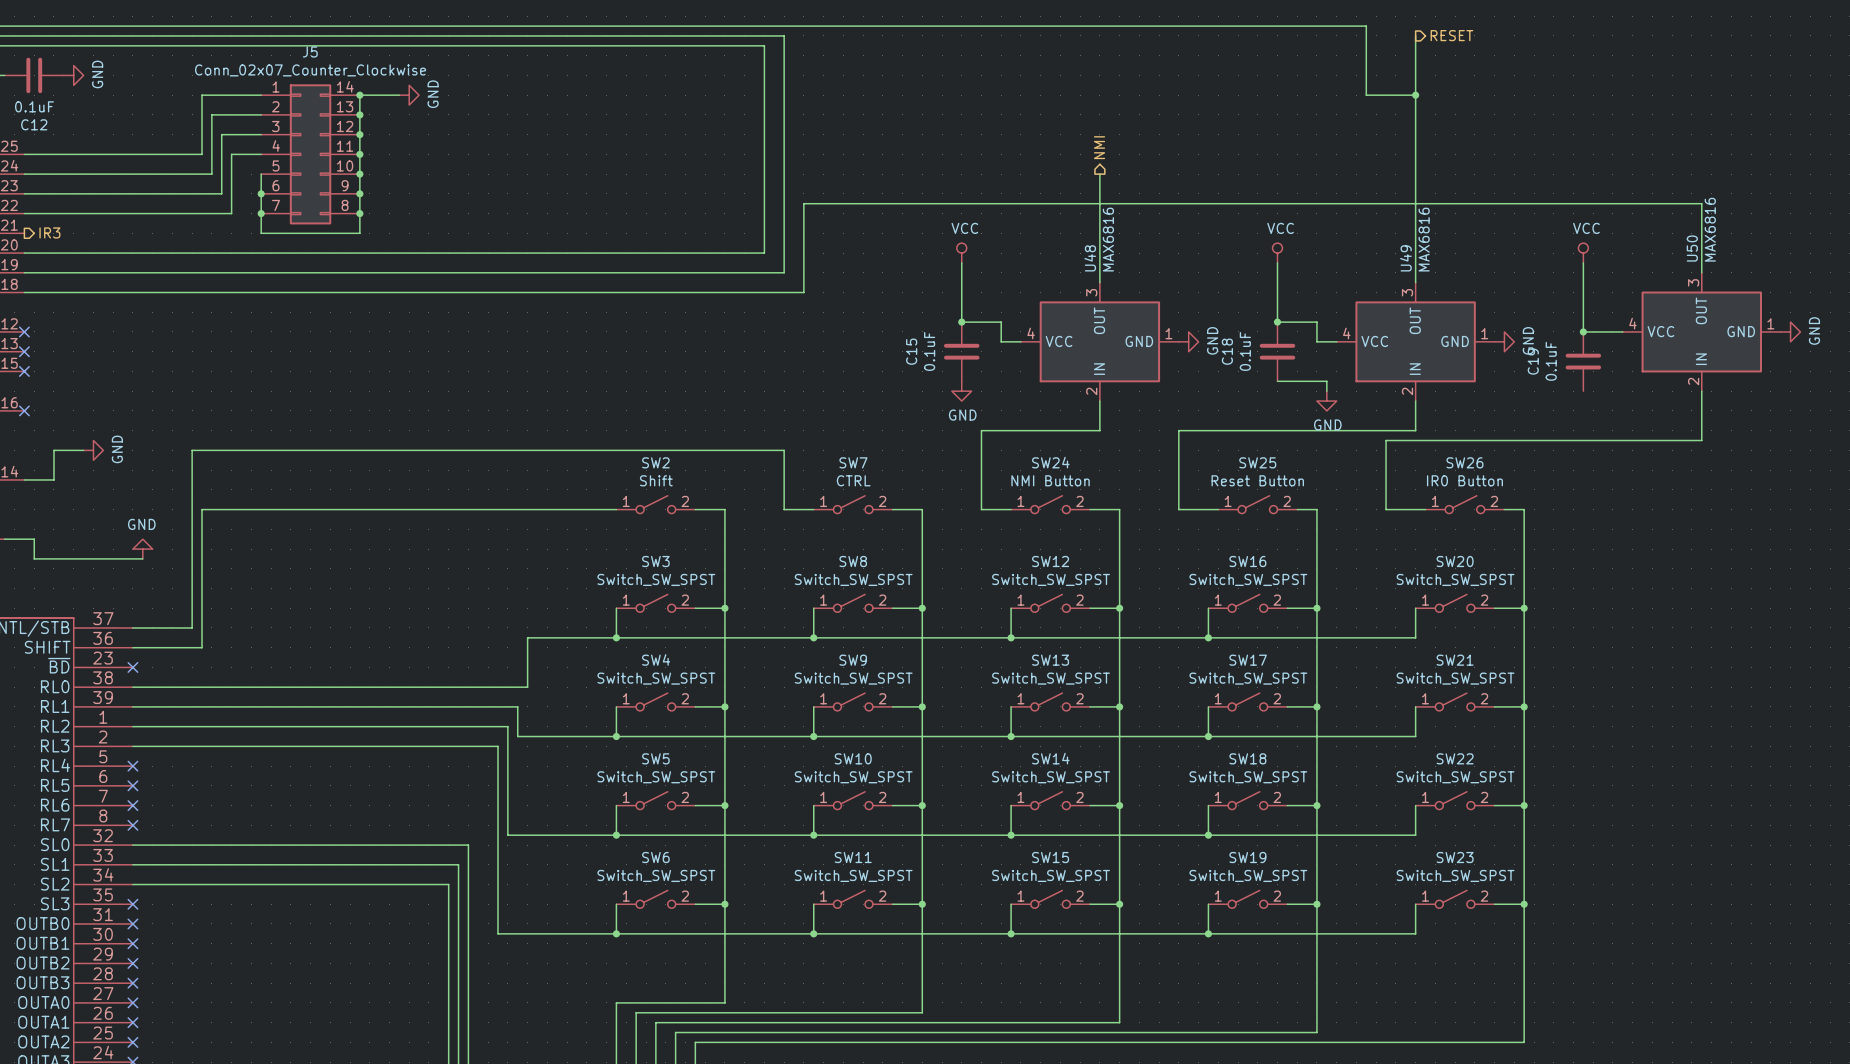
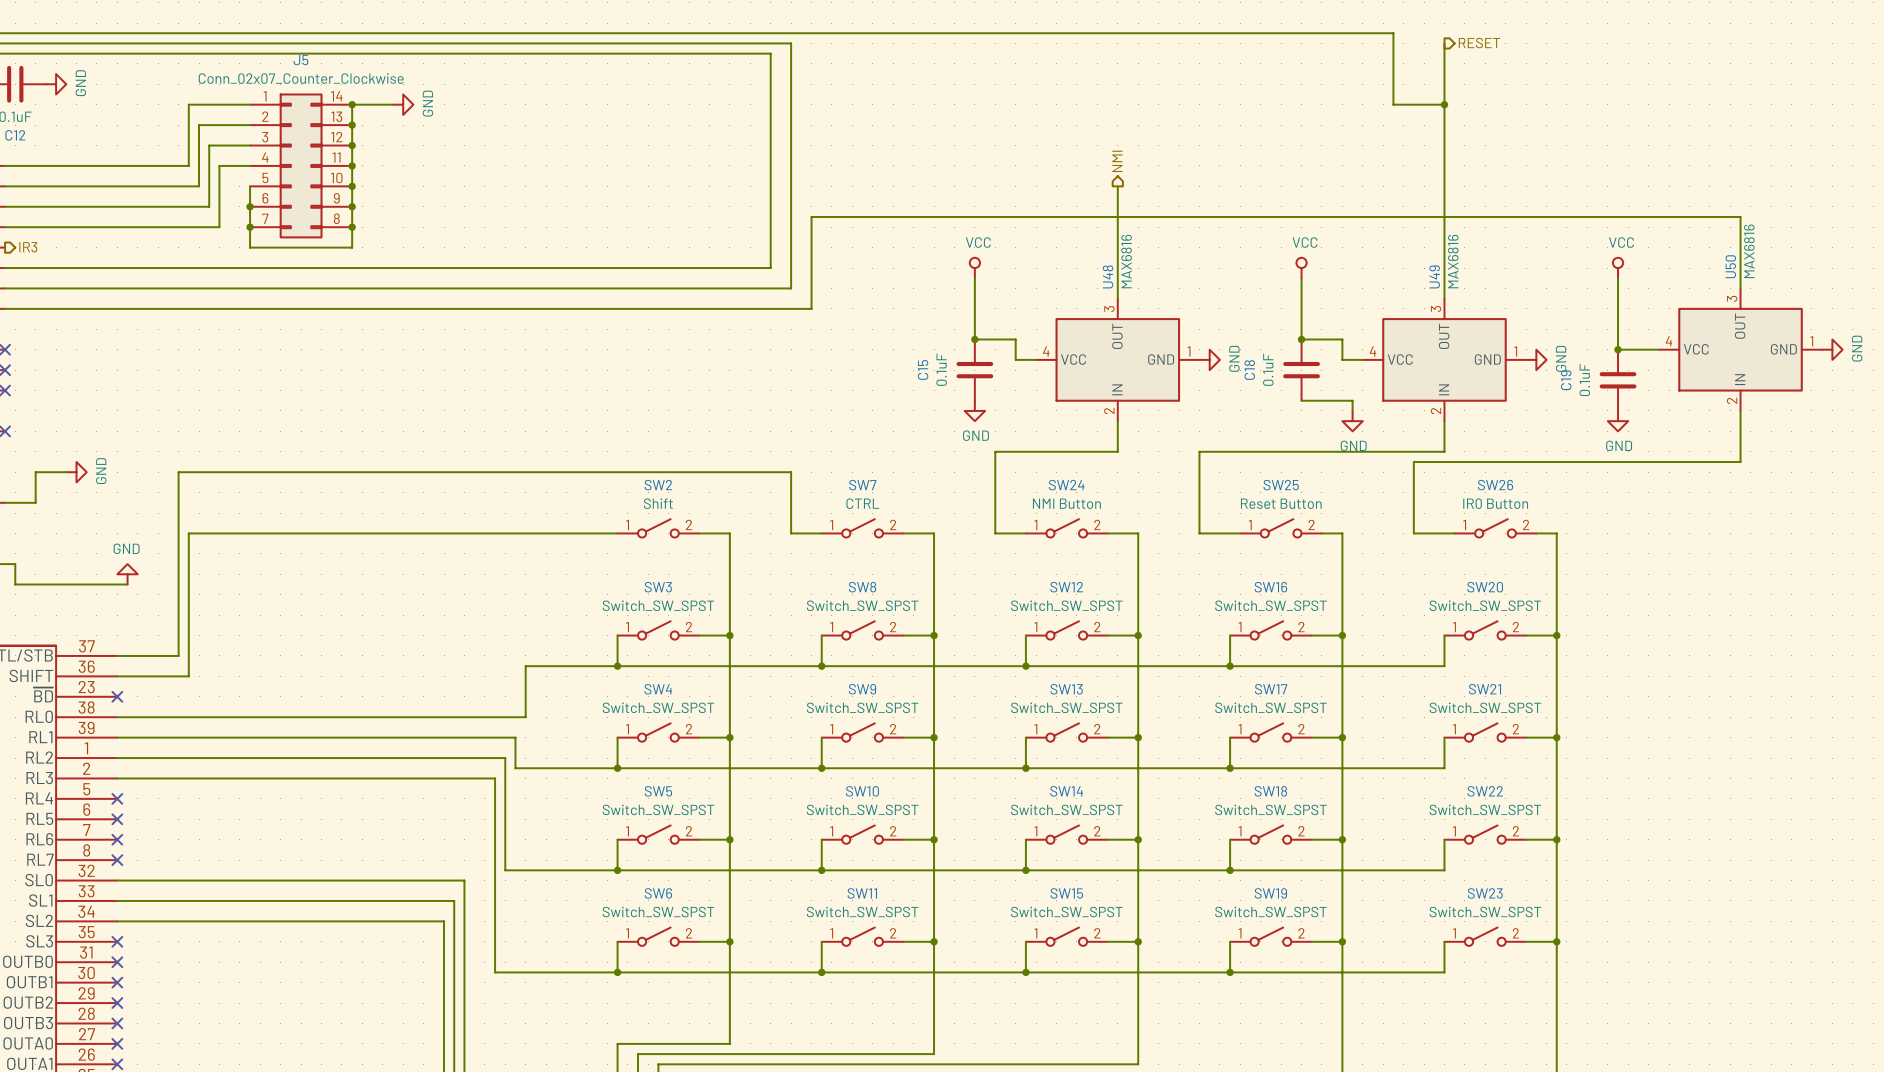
power symbol: none -> GND (1618, 421)

